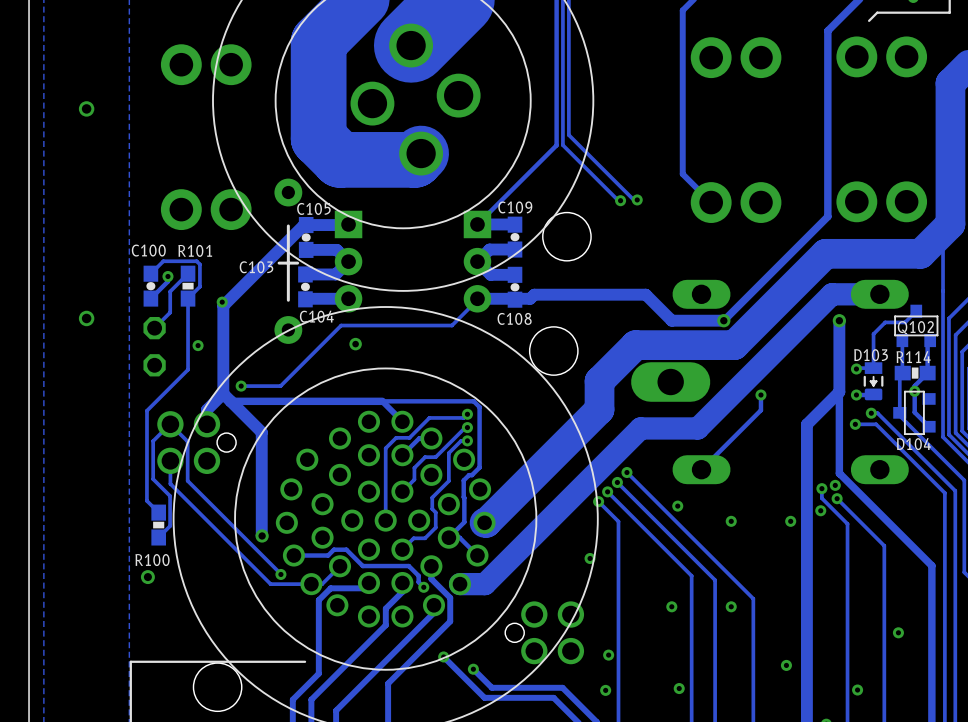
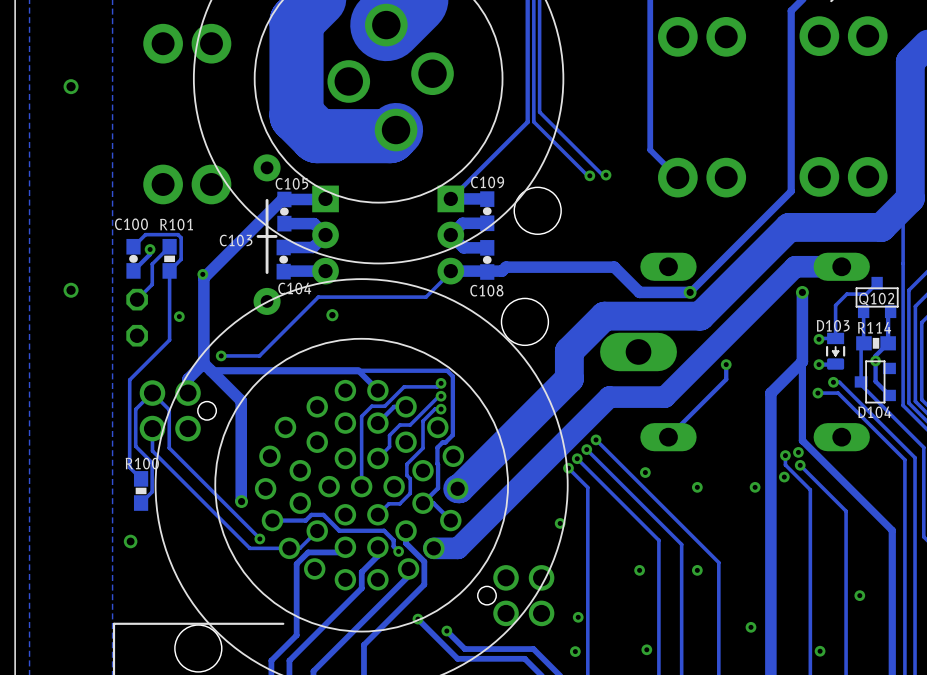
R100 name position: R100 (152, 560) -> R100 (142, 463)

